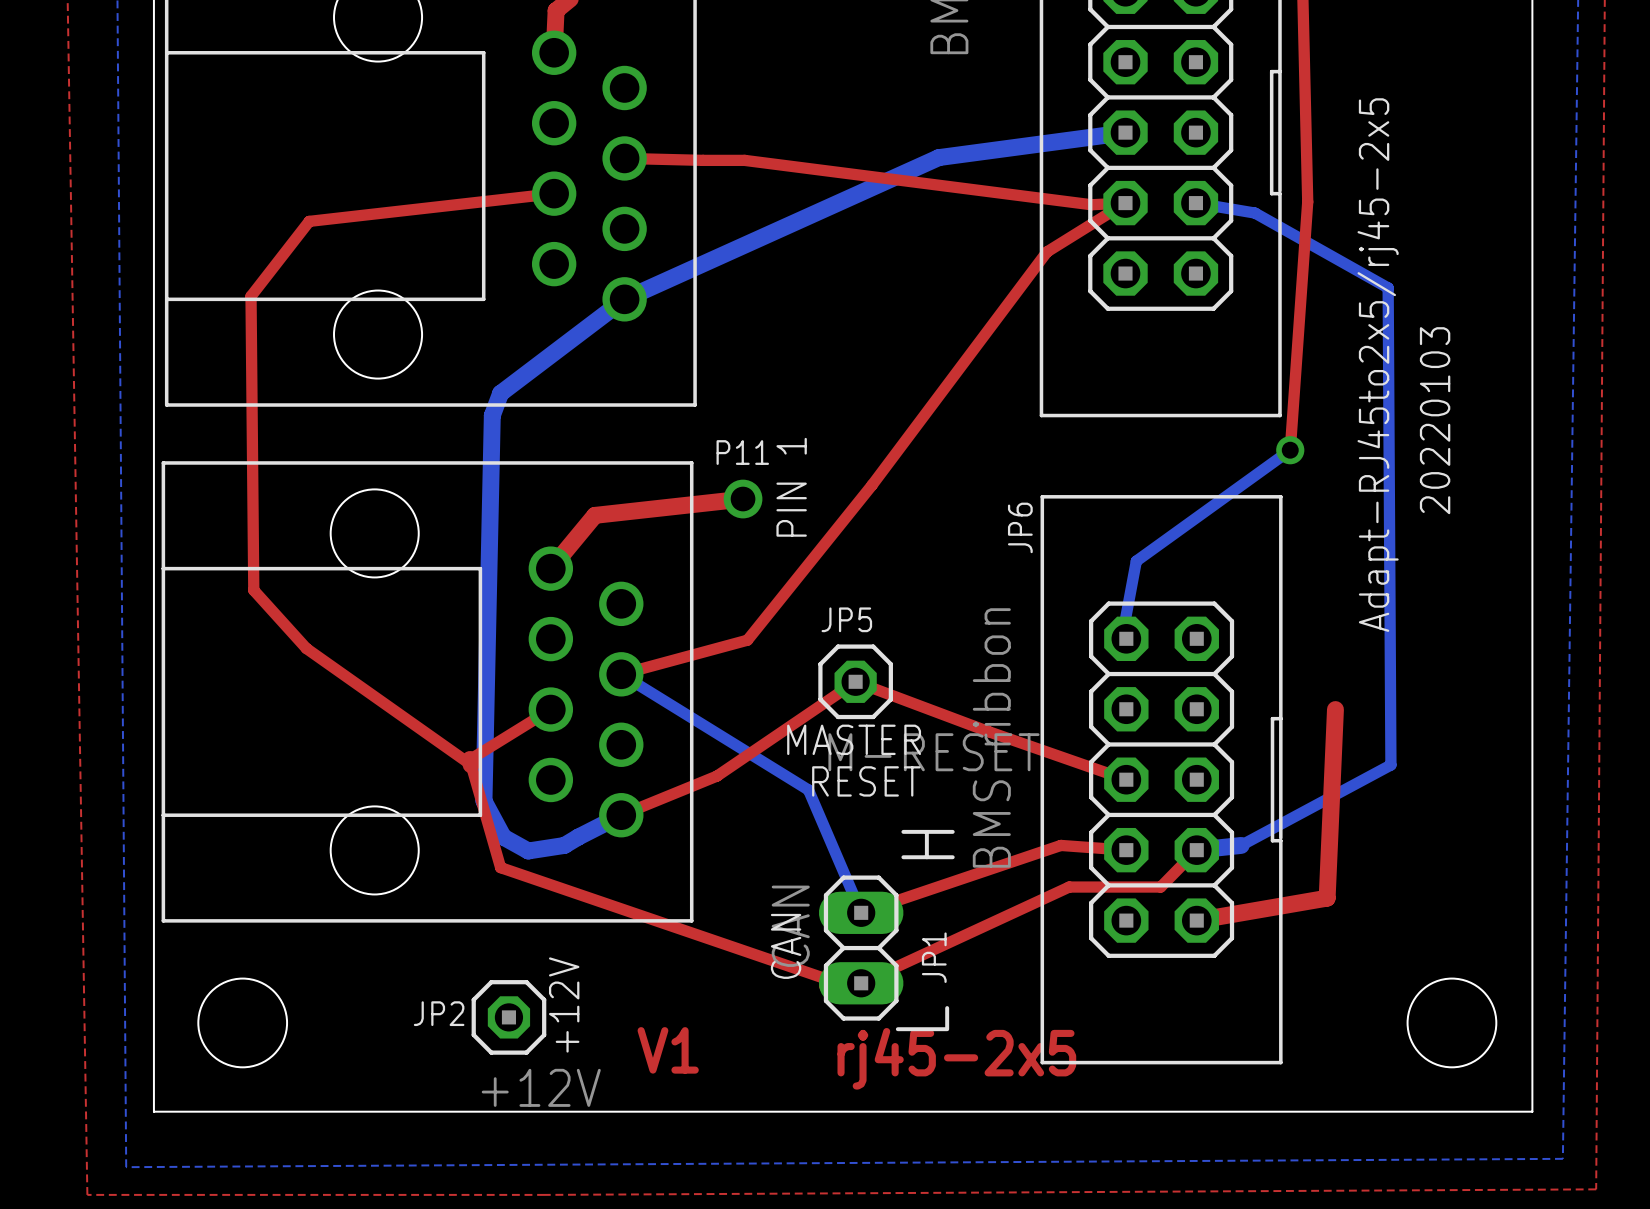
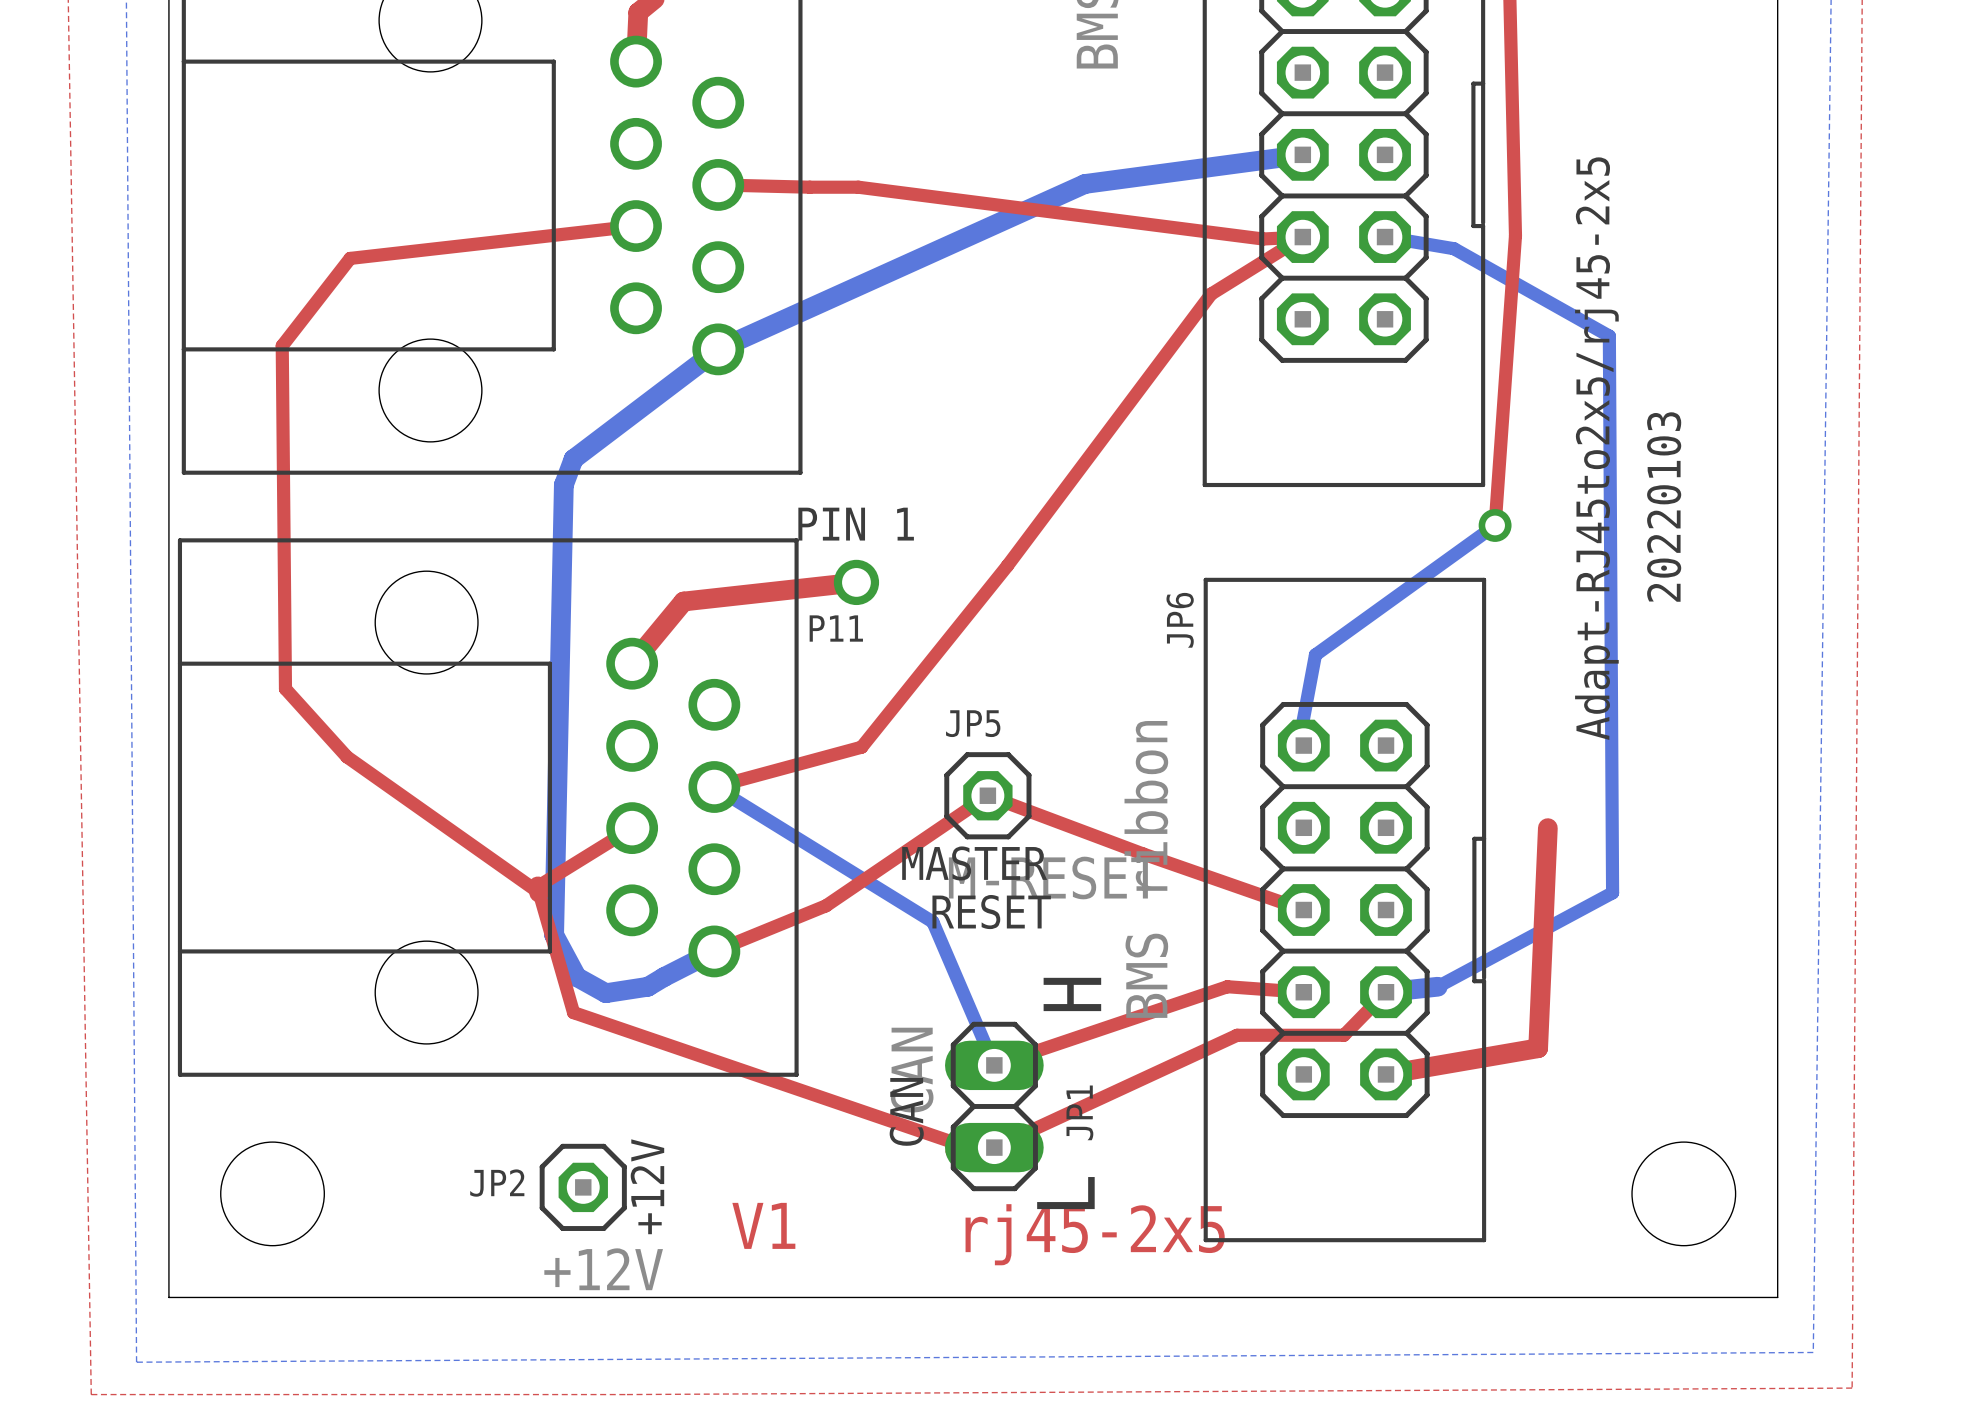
P11 name position: P11 (742, 452) -> P11 (836, 628)
text rotation: 0° (791, 487) -> 90° clockwise (856, 524)

